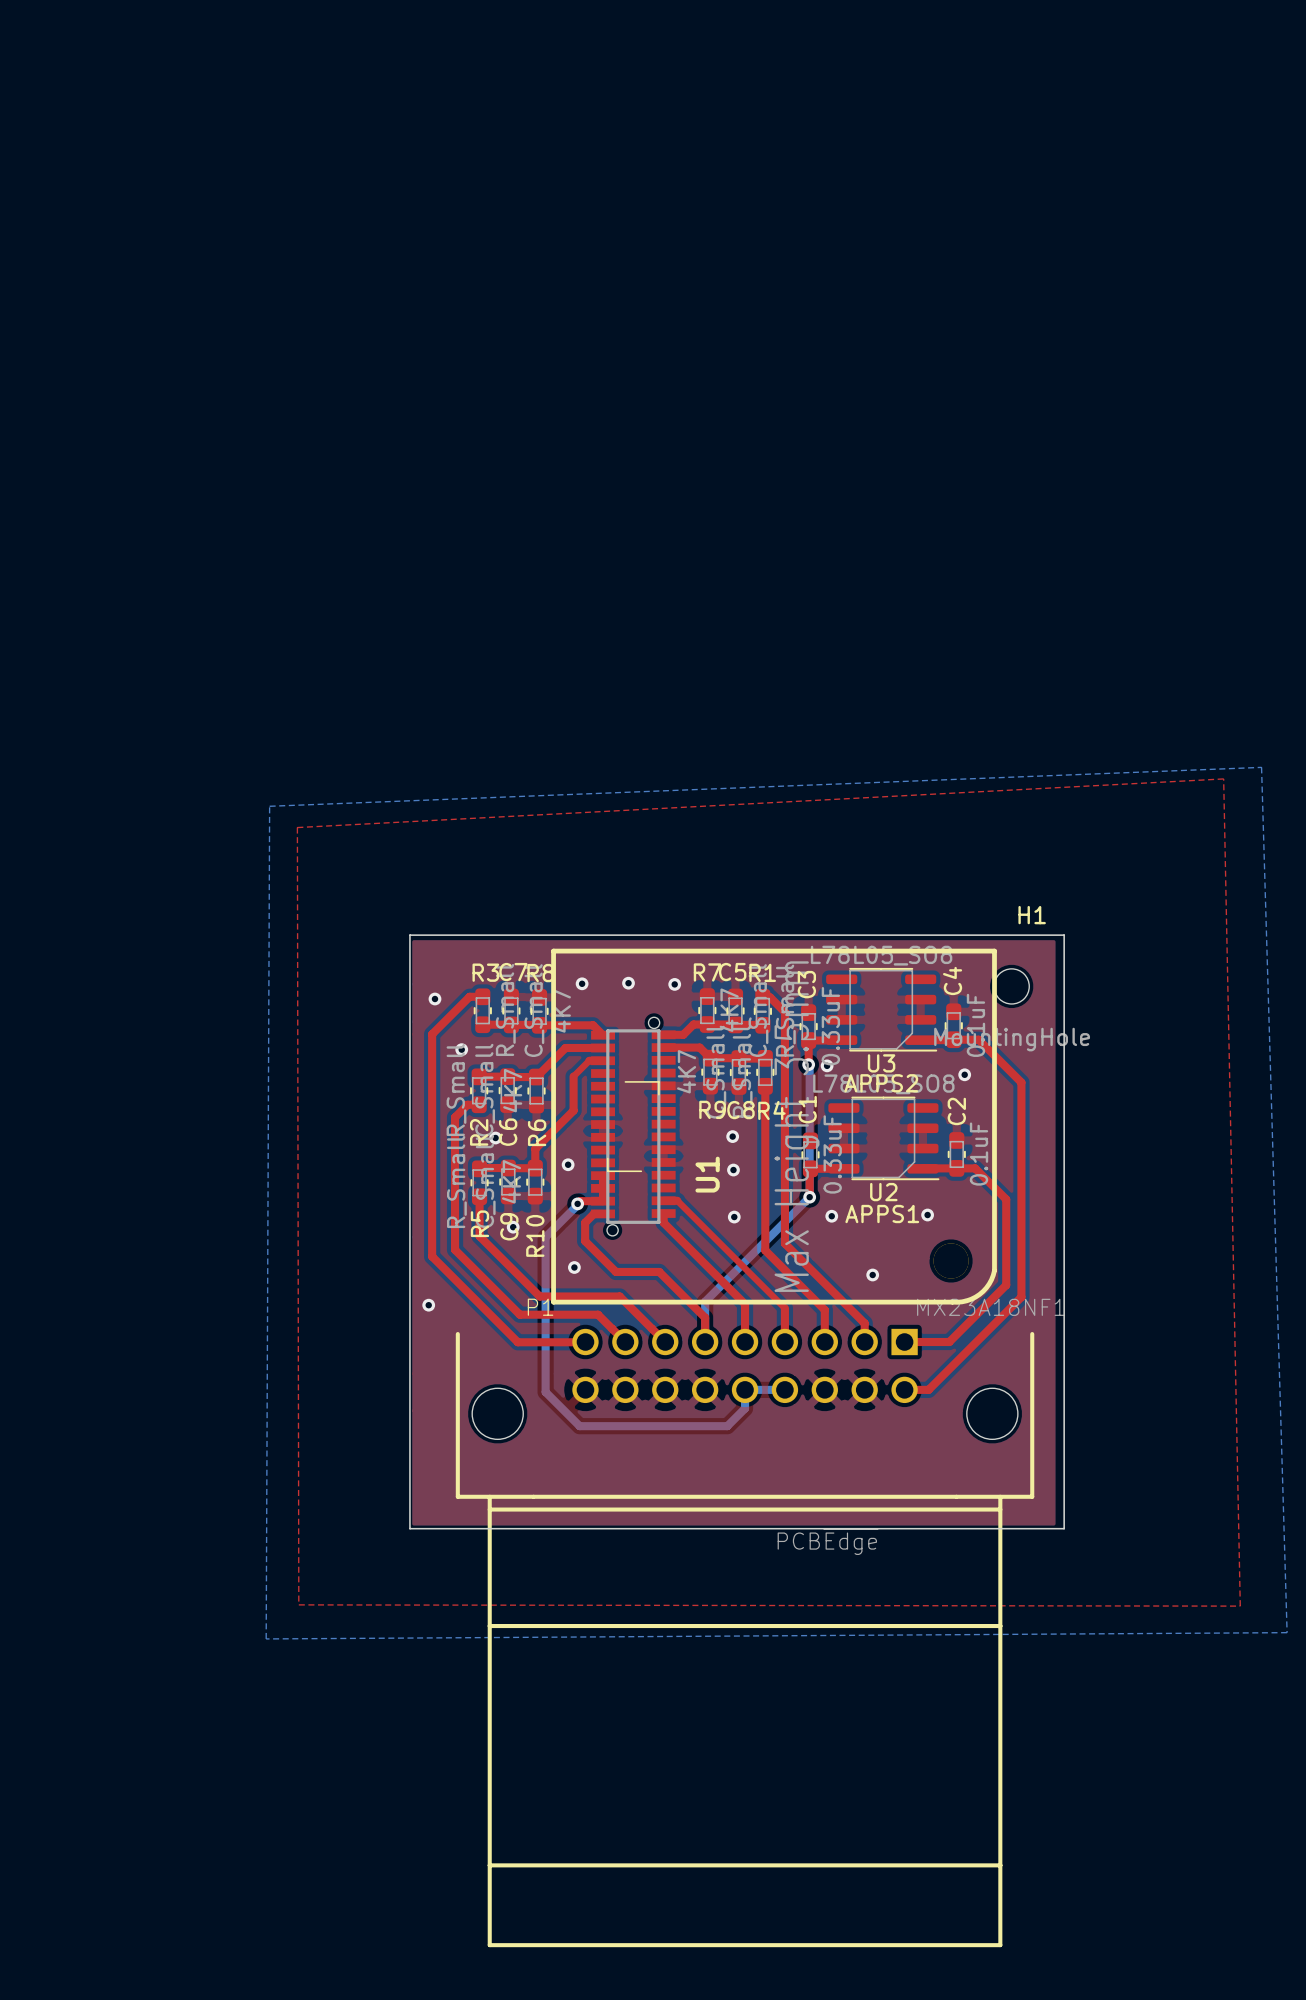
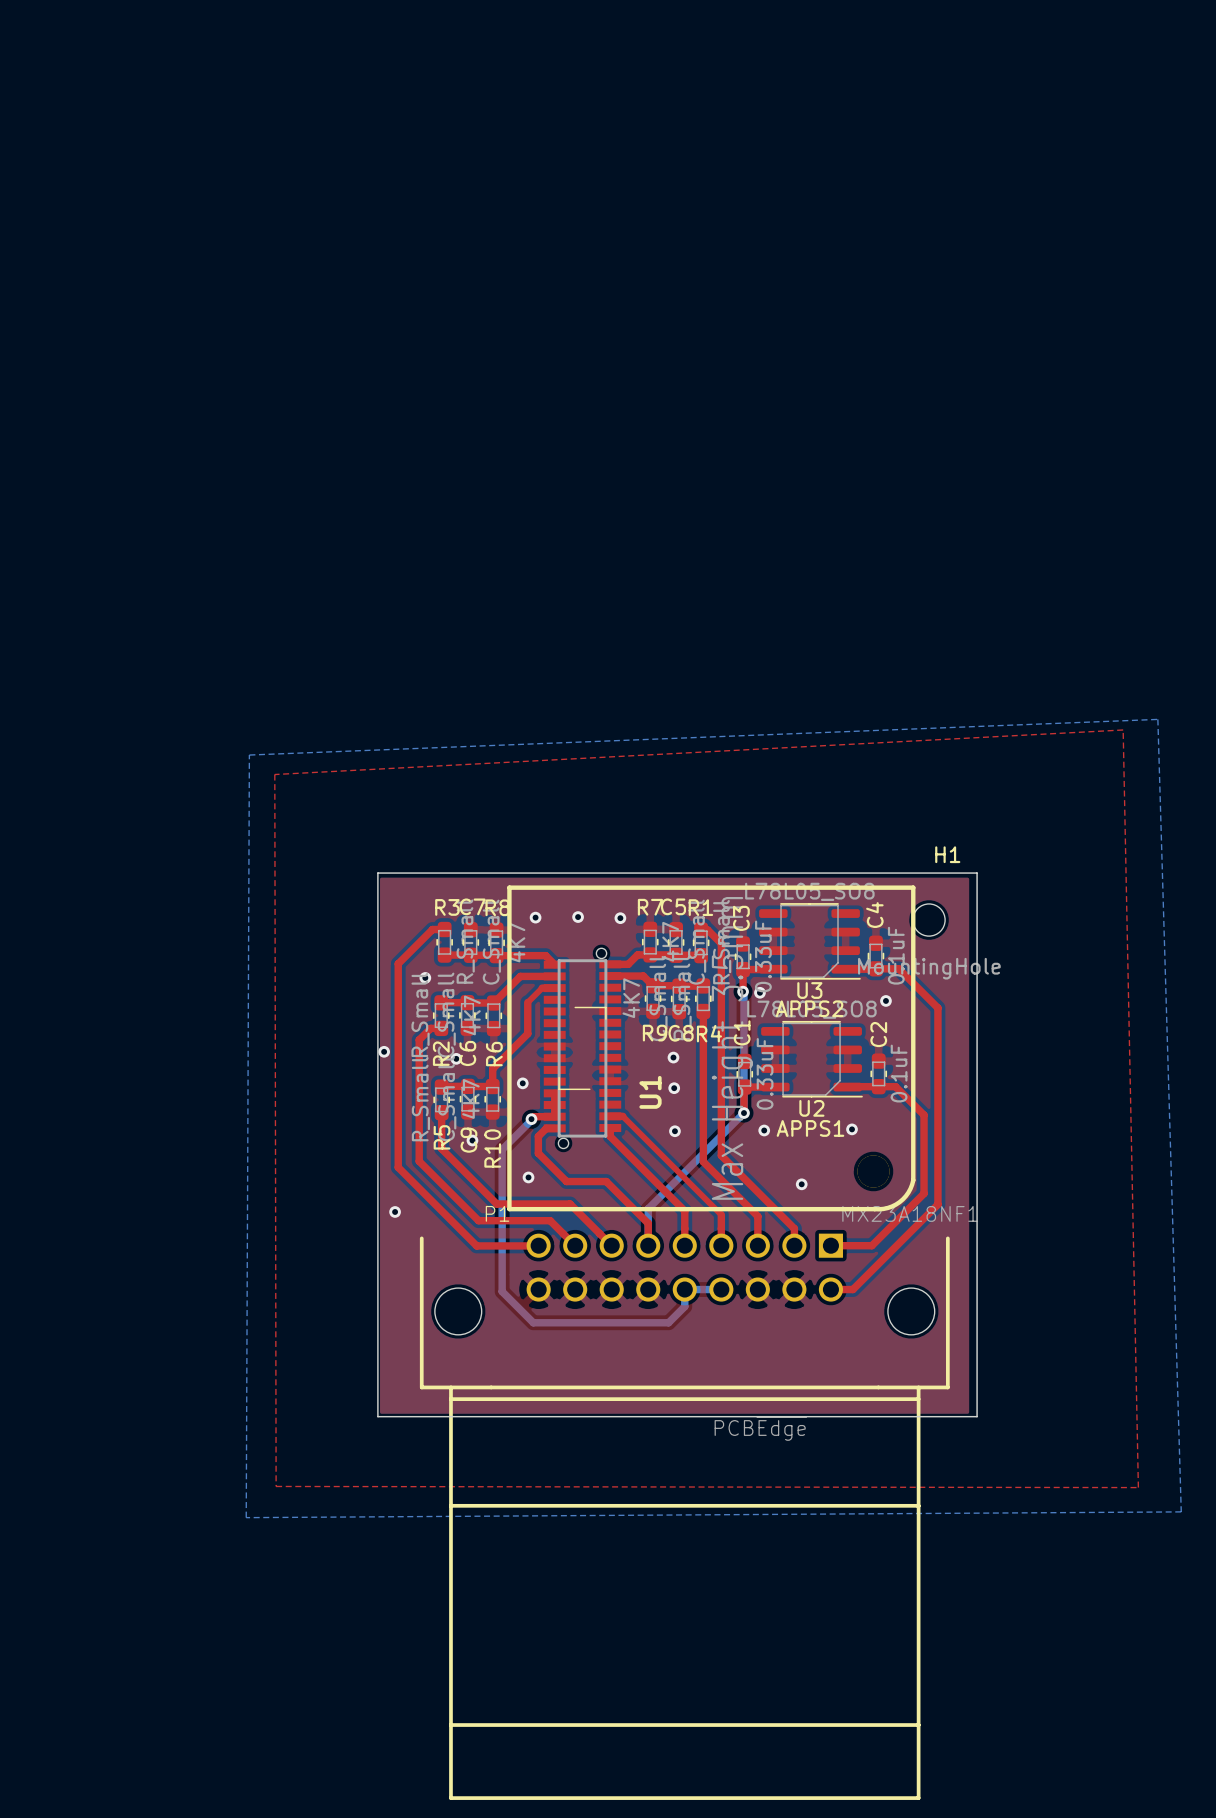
via: (434, 999) -> none
via: none -> (384, 1051)

